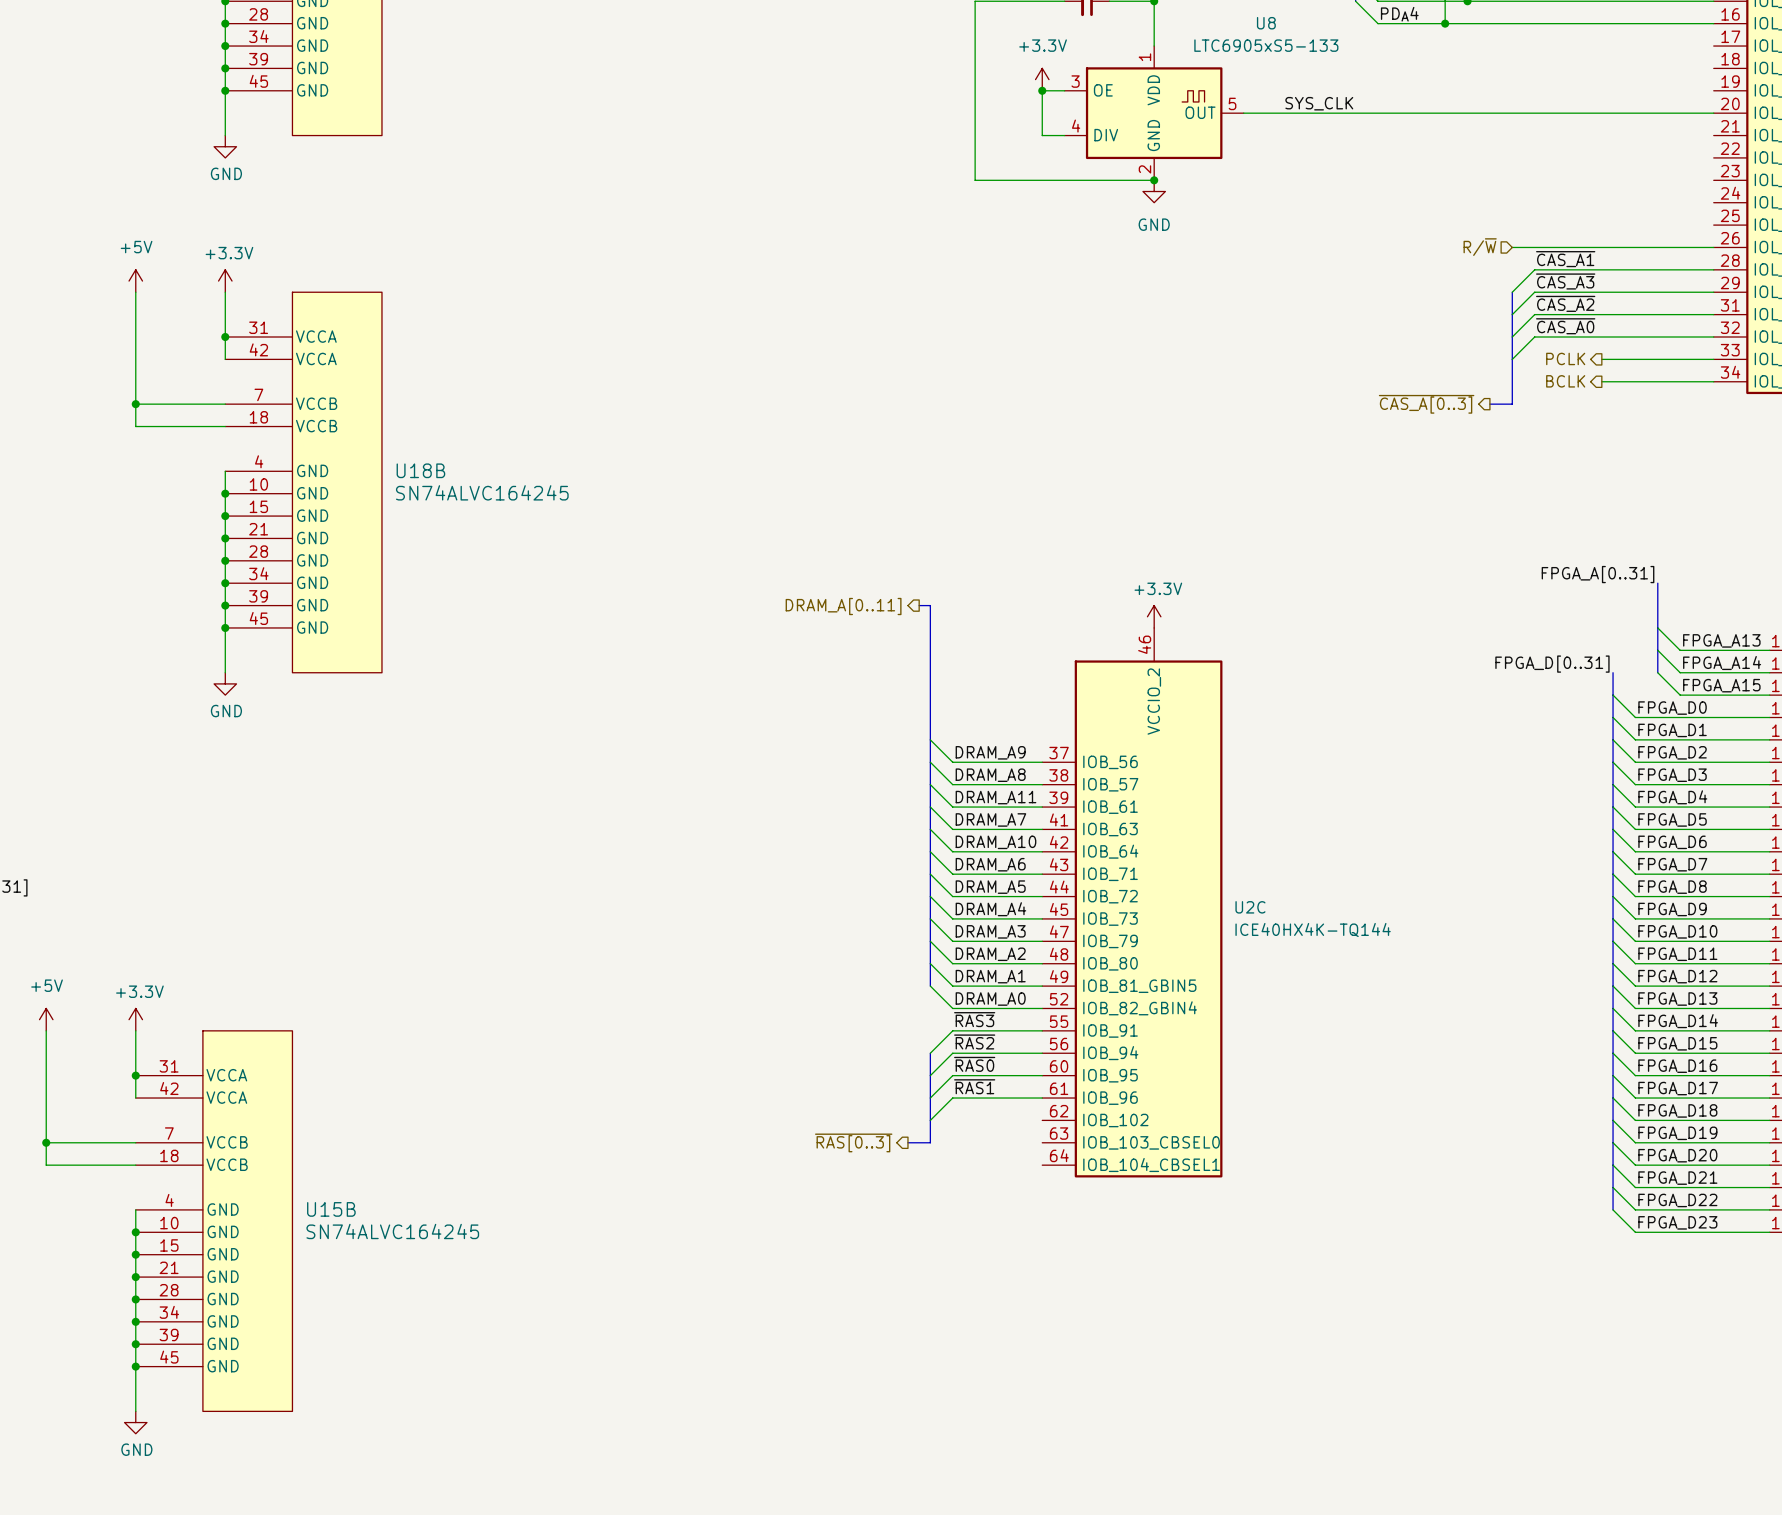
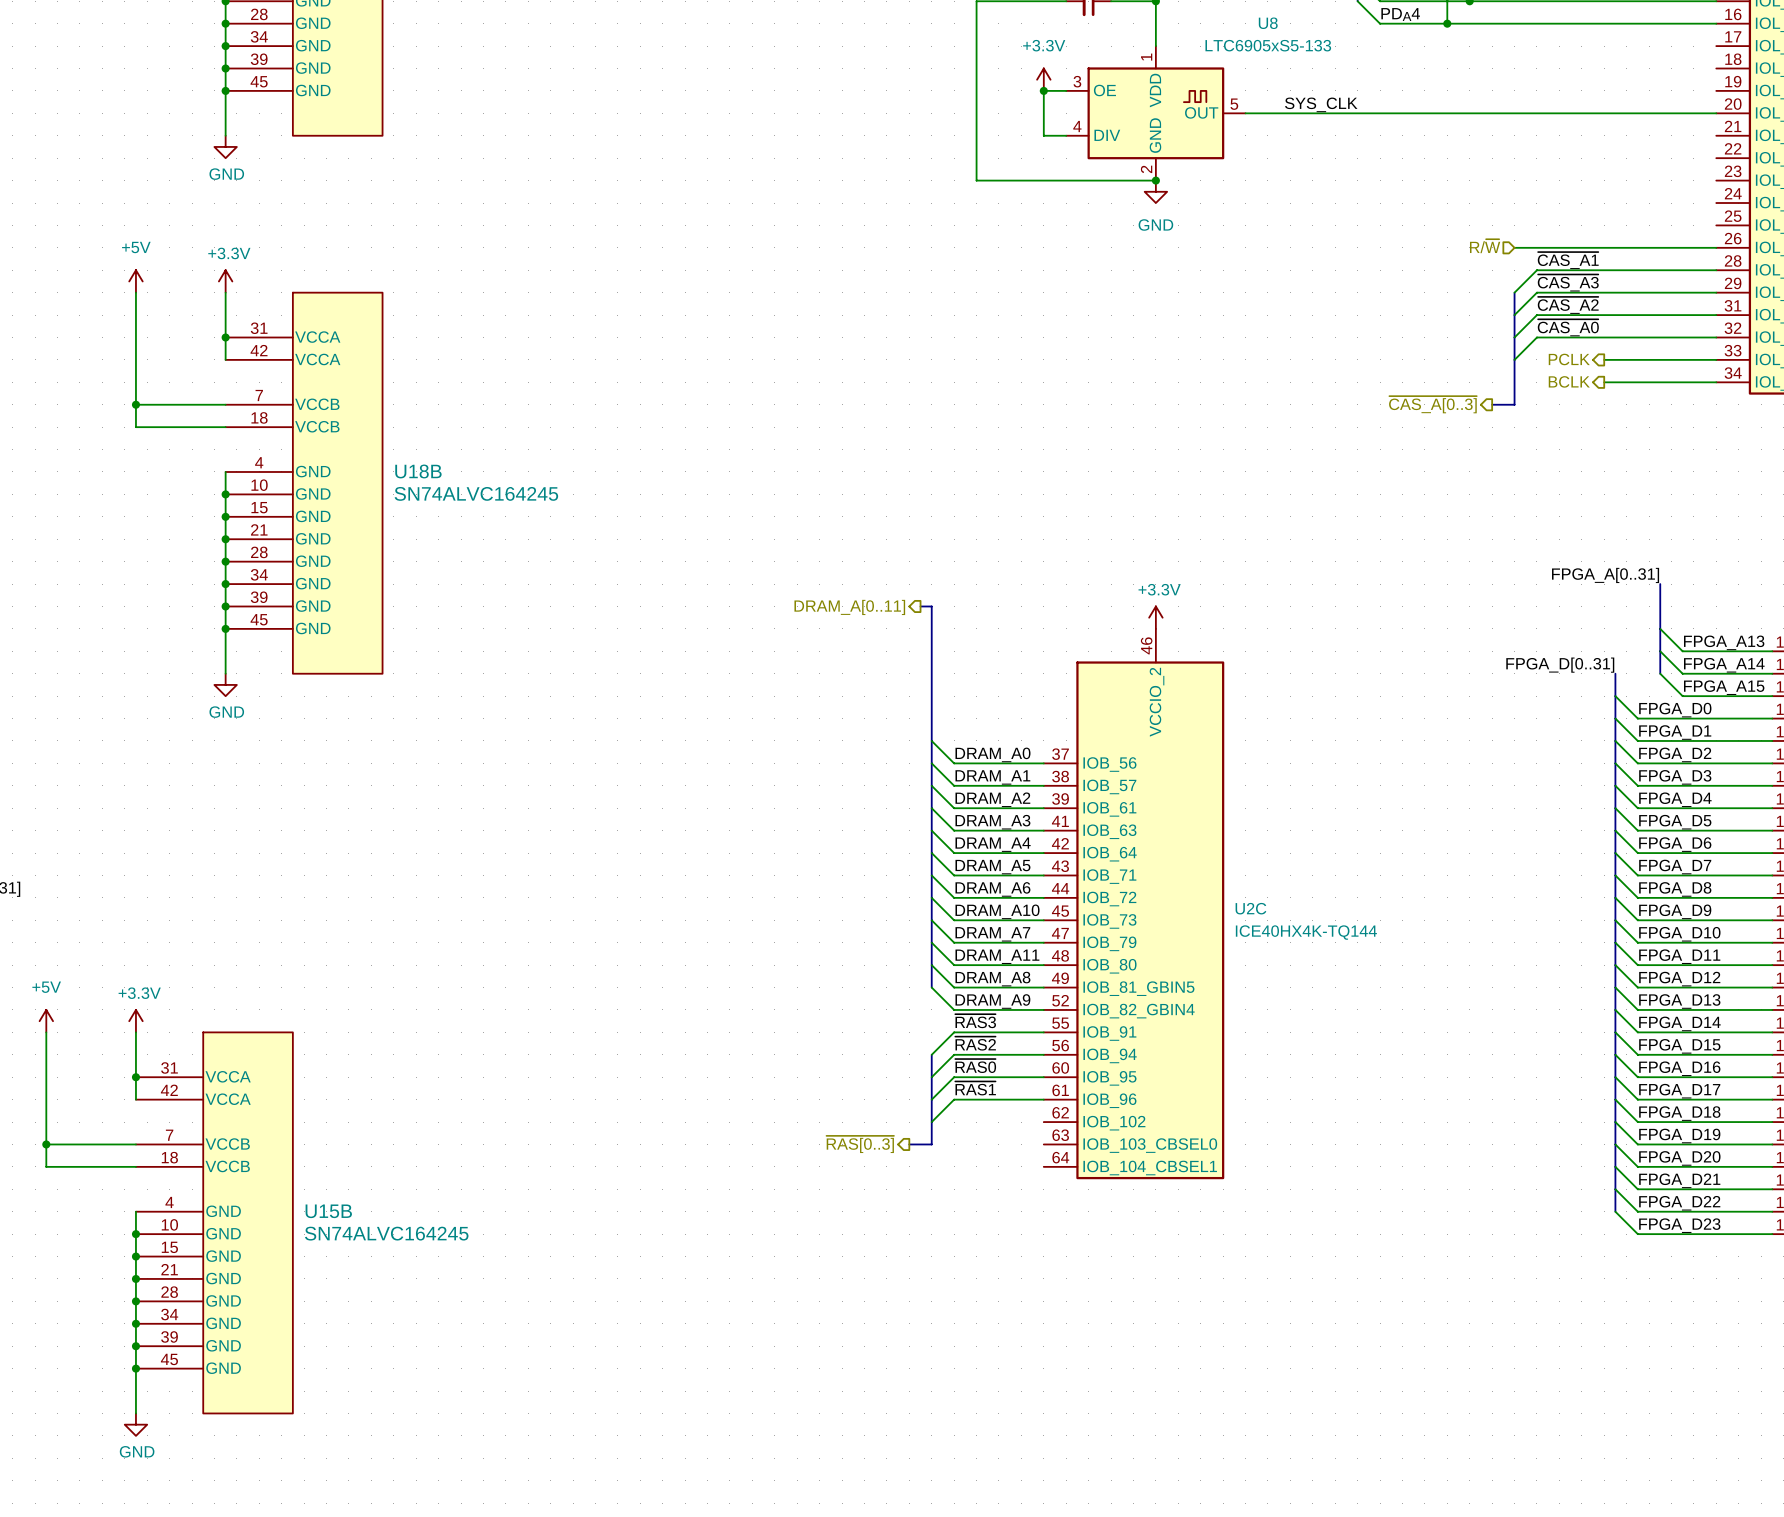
label: DRAM_A9 (990, 752) -> DRAM_A0 (992, 754)
label: DRAM_A8 (990, 775) -> DRAM_A1 (992, 777)
label: DRAM_A11 (995, 797) -> DRAM_A2 (992, 799)
label: DRAM_A7 (990, 819) -> DRAM_A3 (992, 822)
label: DRAM_A10 (995, 842) -> DRAM_A4 (993, 844)
label: DRAM_A6 (990, 864) -> DRAM_A5 (992, 867)
label: DRAM_A5 (990, 887) -> DRAM_A6 (992, 889)
label: DRAM_A4 (990, 909) -> DRAM_A10 (997, 911)
label: DRAM_A3 (990, 931) -> DRAM_A7 (992, 934)
label: DRAM_A2 (990, 954) -> DRAM_A11 (997, 956)
label: DRAM_A1 (990, 976) -> DRAM_A8 (992, 979)
label: DRAM_A0 (990, 999) -> DRAM_A9 (992, 1001)

